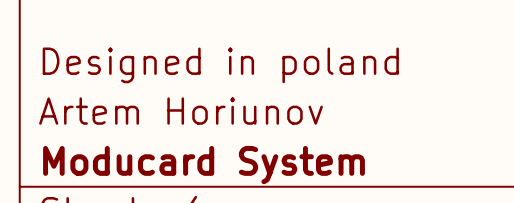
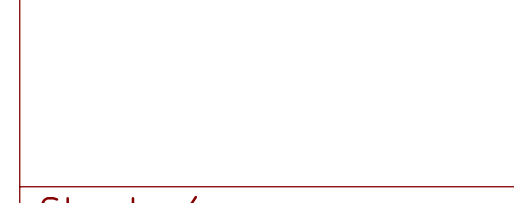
title block: Designed in poland (220, 65) -> none
title block: Artem Horiunov (181, 111) -> none
title block: Moducard System (203, 165) -> none

